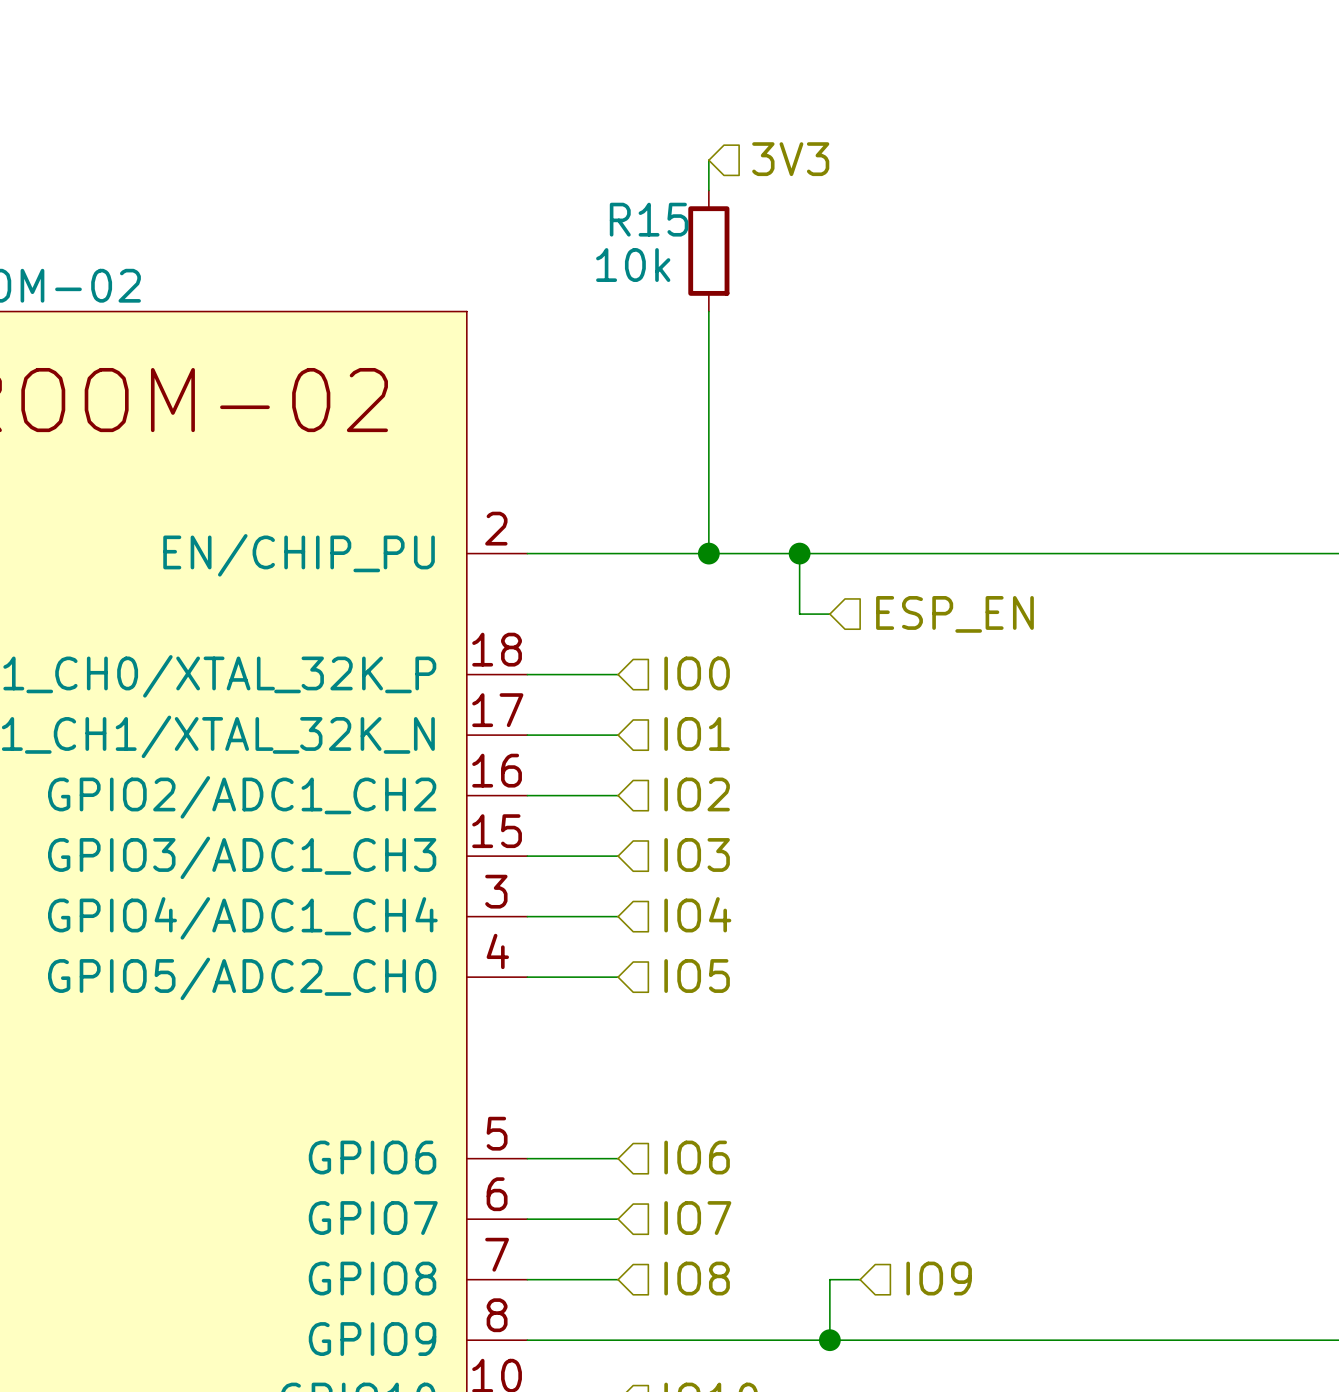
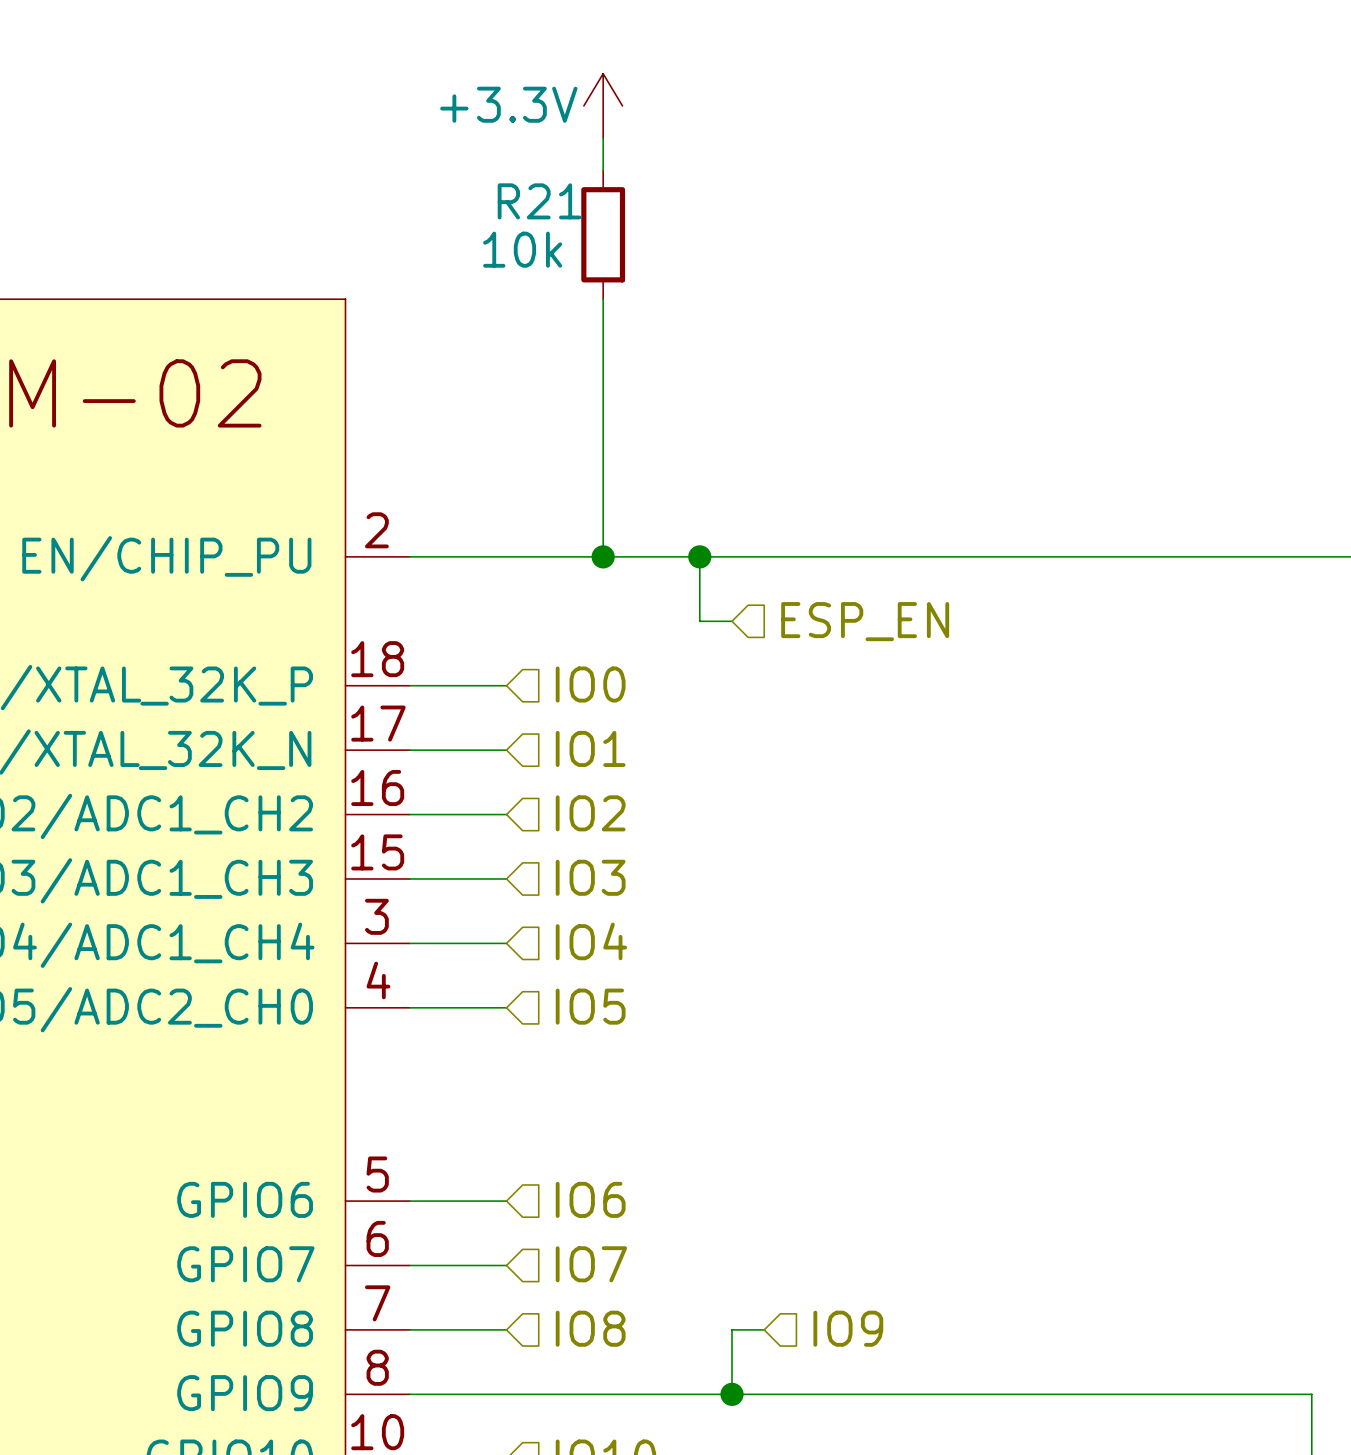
power symbol: none -> +3.3V (603, 105)
hierarchical label: 3V3 (790, 159) -> none
R15 name: R15 (649, 219) -> R21 (539, 201)

